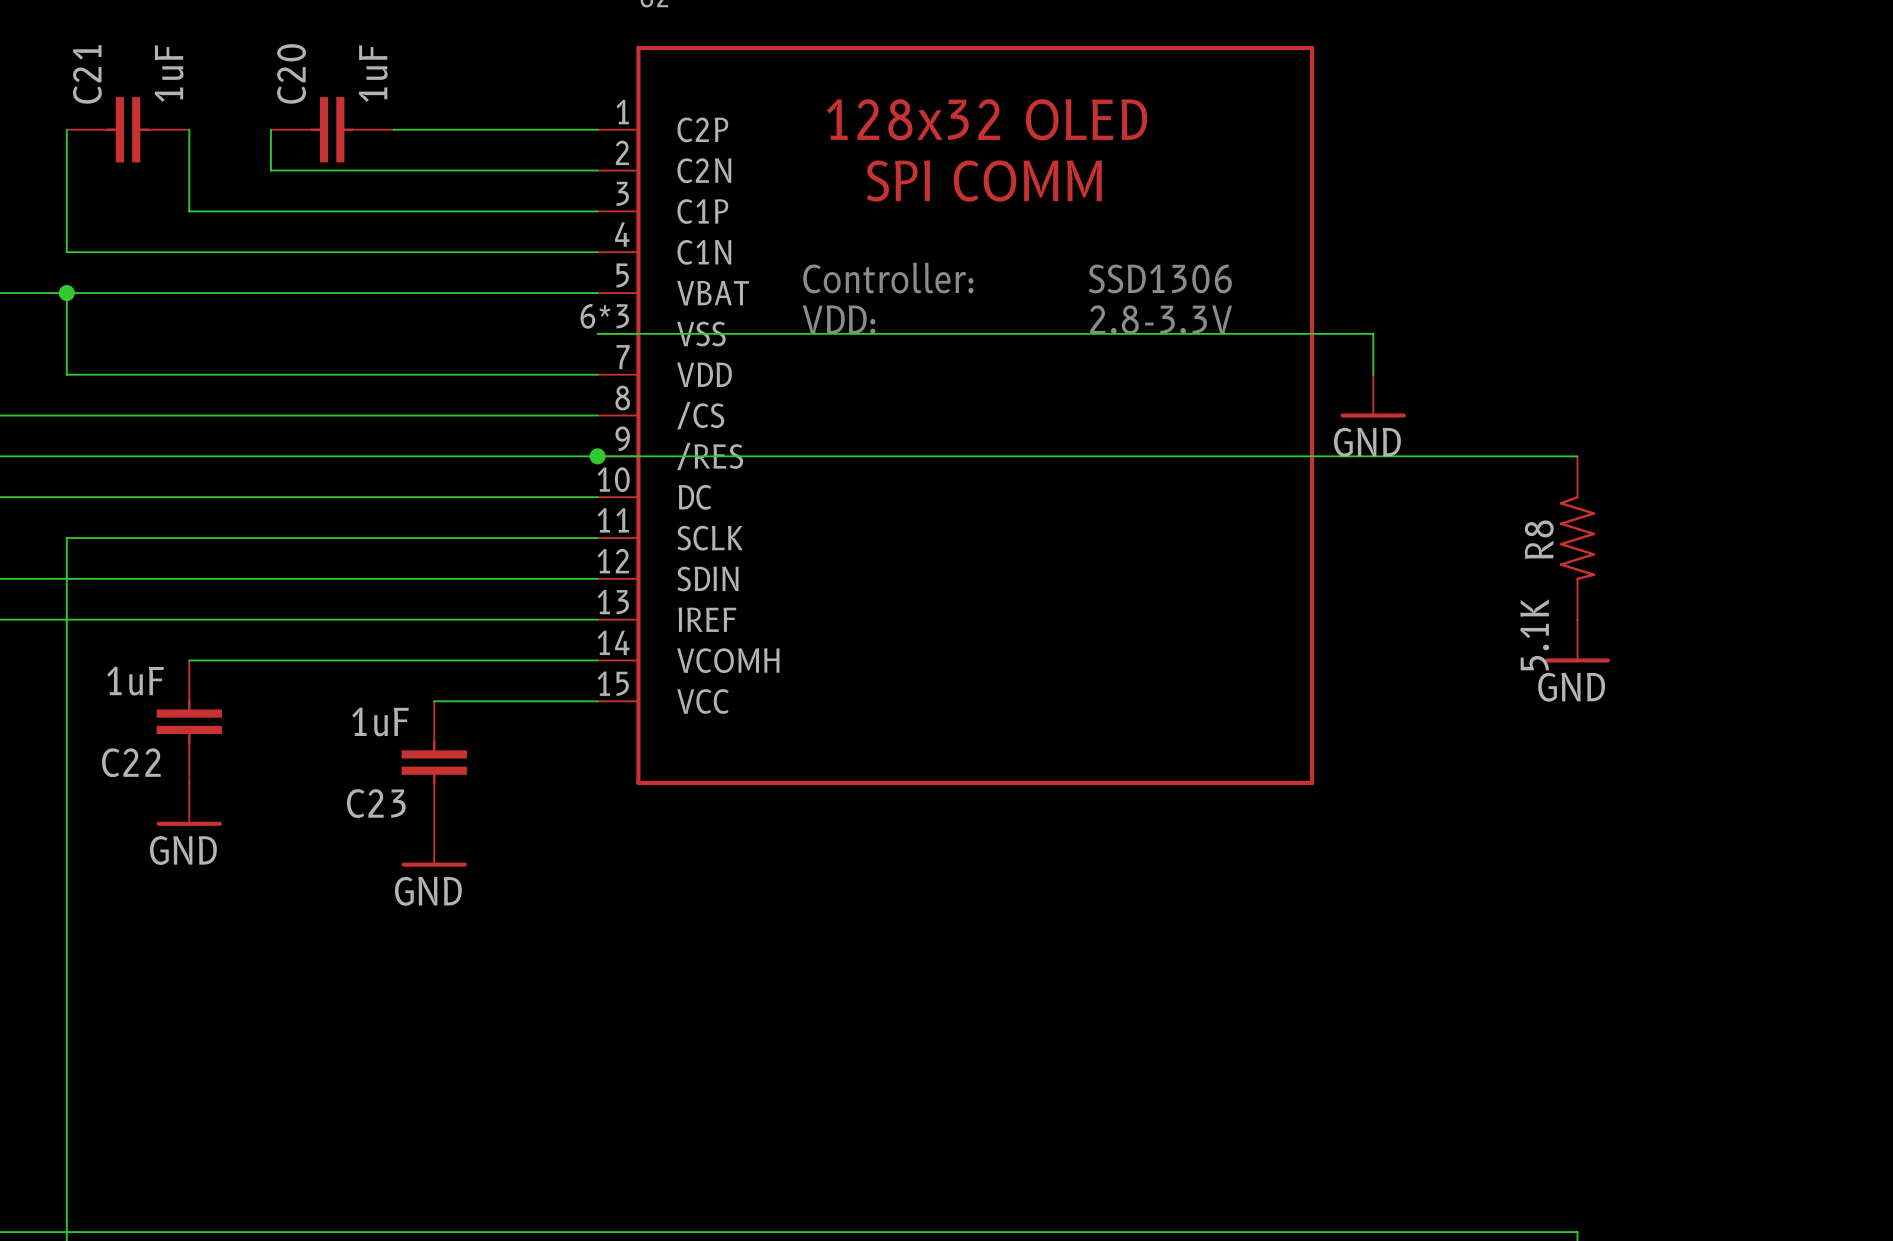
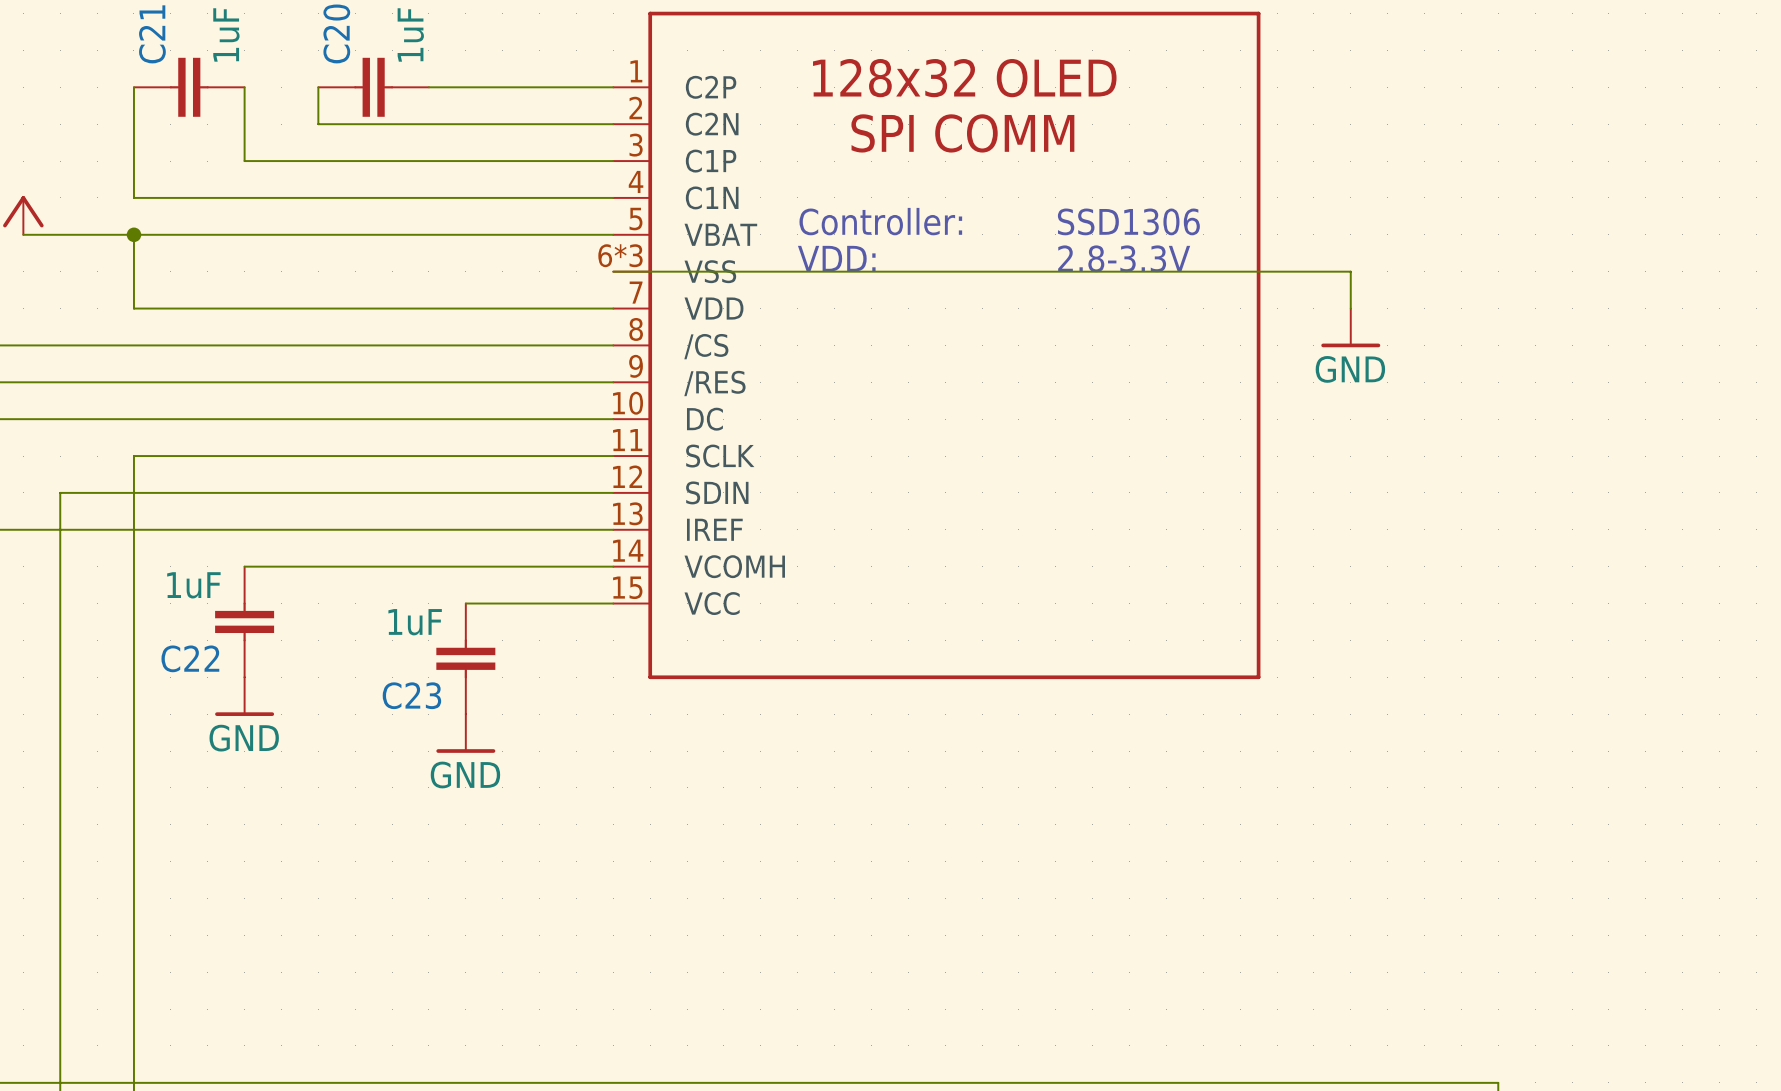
wire: (1373, 333) (1373, 374) -> (1313, 271) (1350, 271) (1350, 308)
power symbol position: GND (1373, 396) -> GND (1350, 327)
wire: (597, 456) (1577, 456) -> none
junction: (597, 456) -> none
R8: 5.1K (1577, 538) -> none
power symbol: GND (1577, 641) -> none

